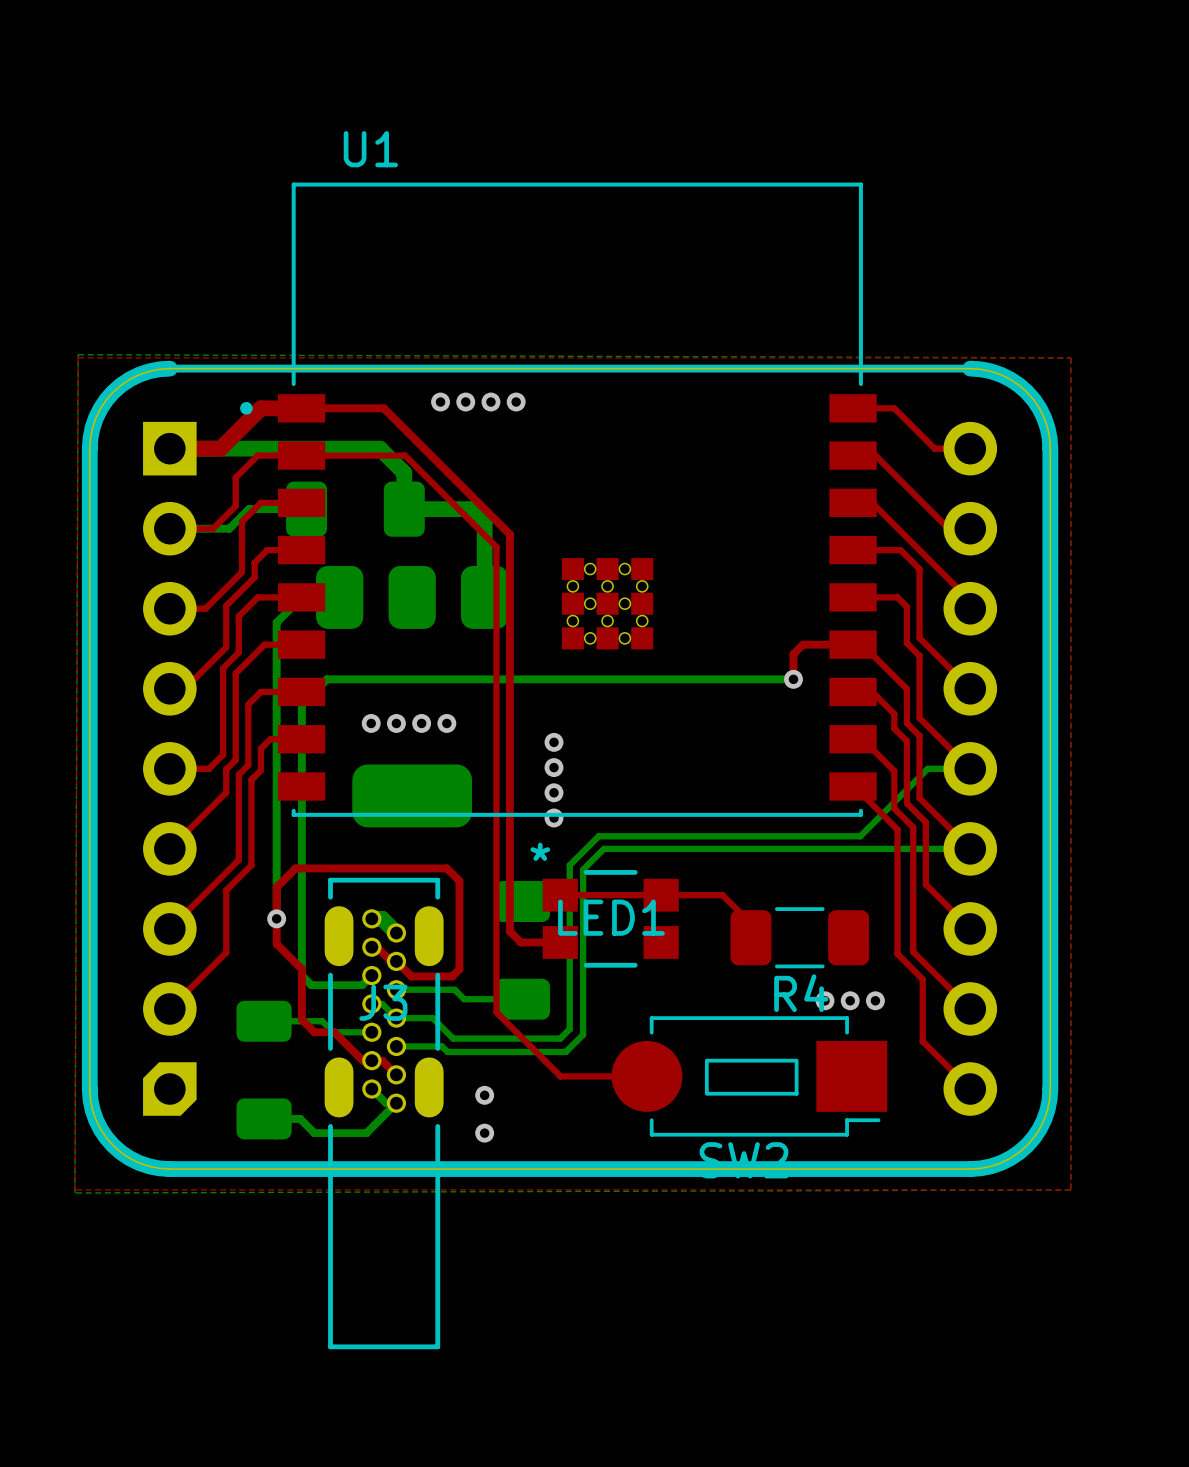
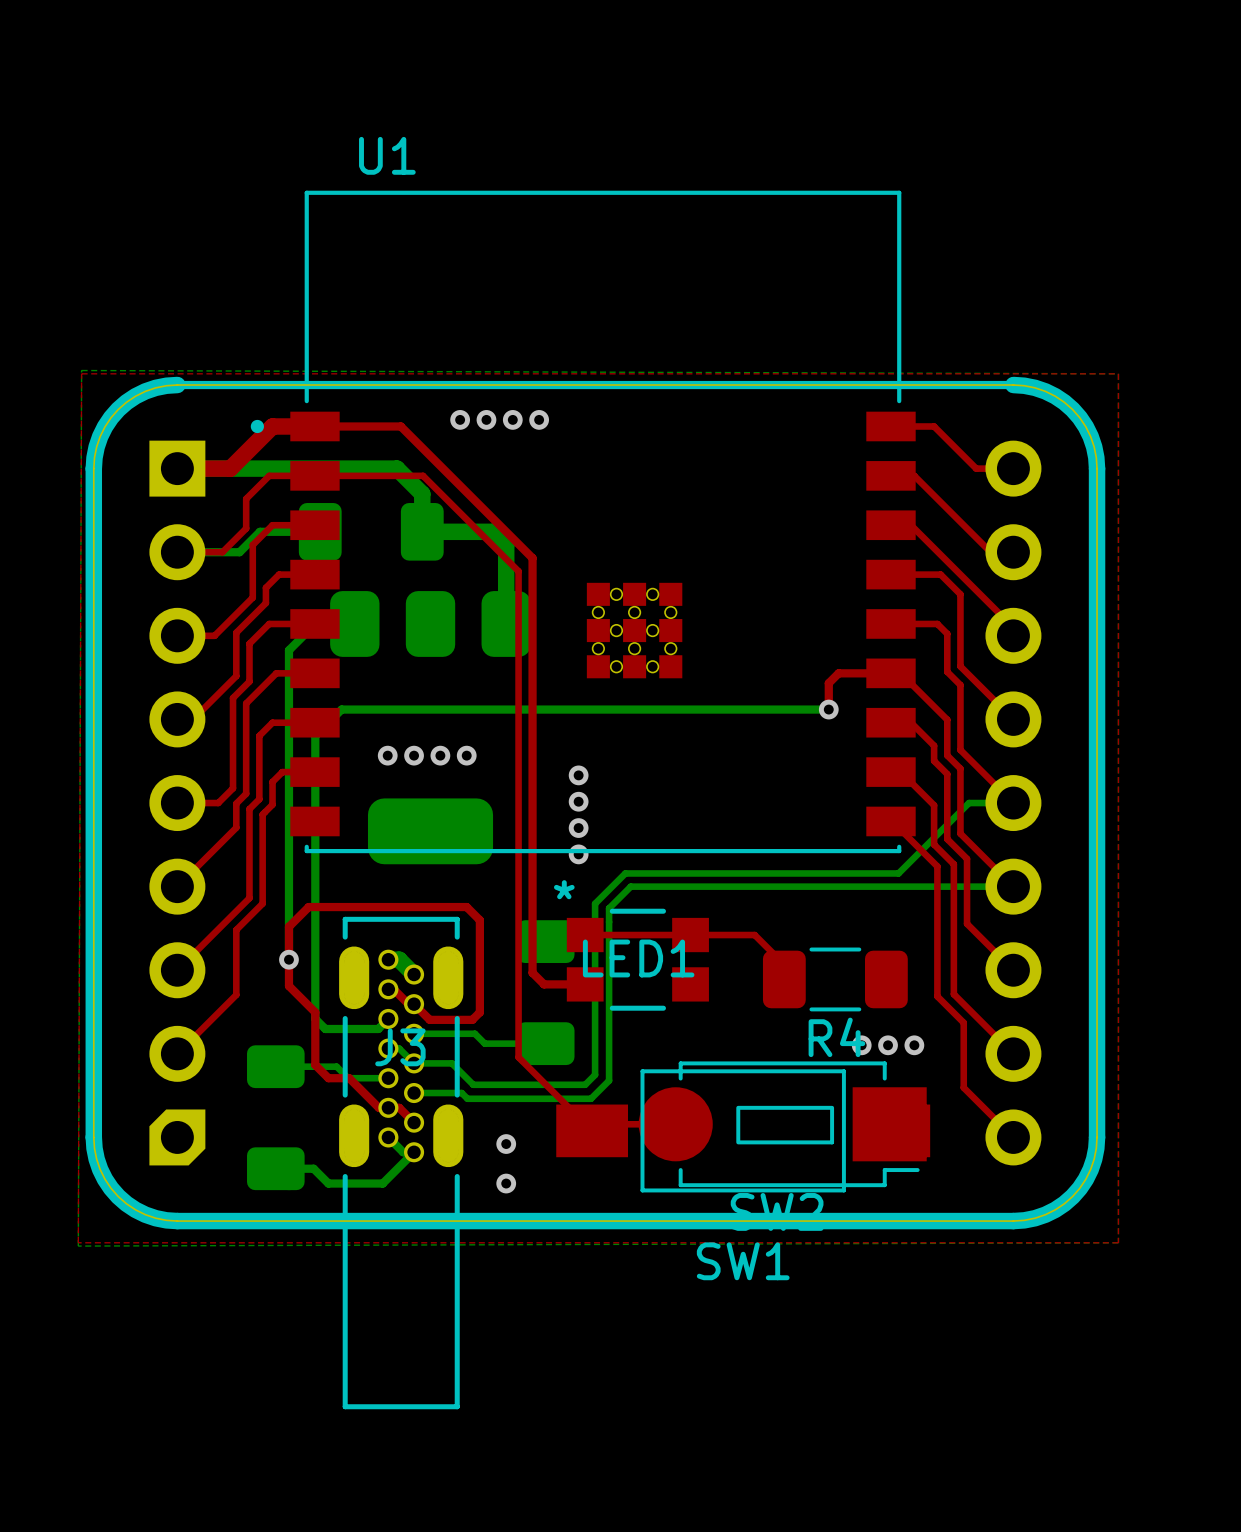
SW1: none -> (743, 1130)

